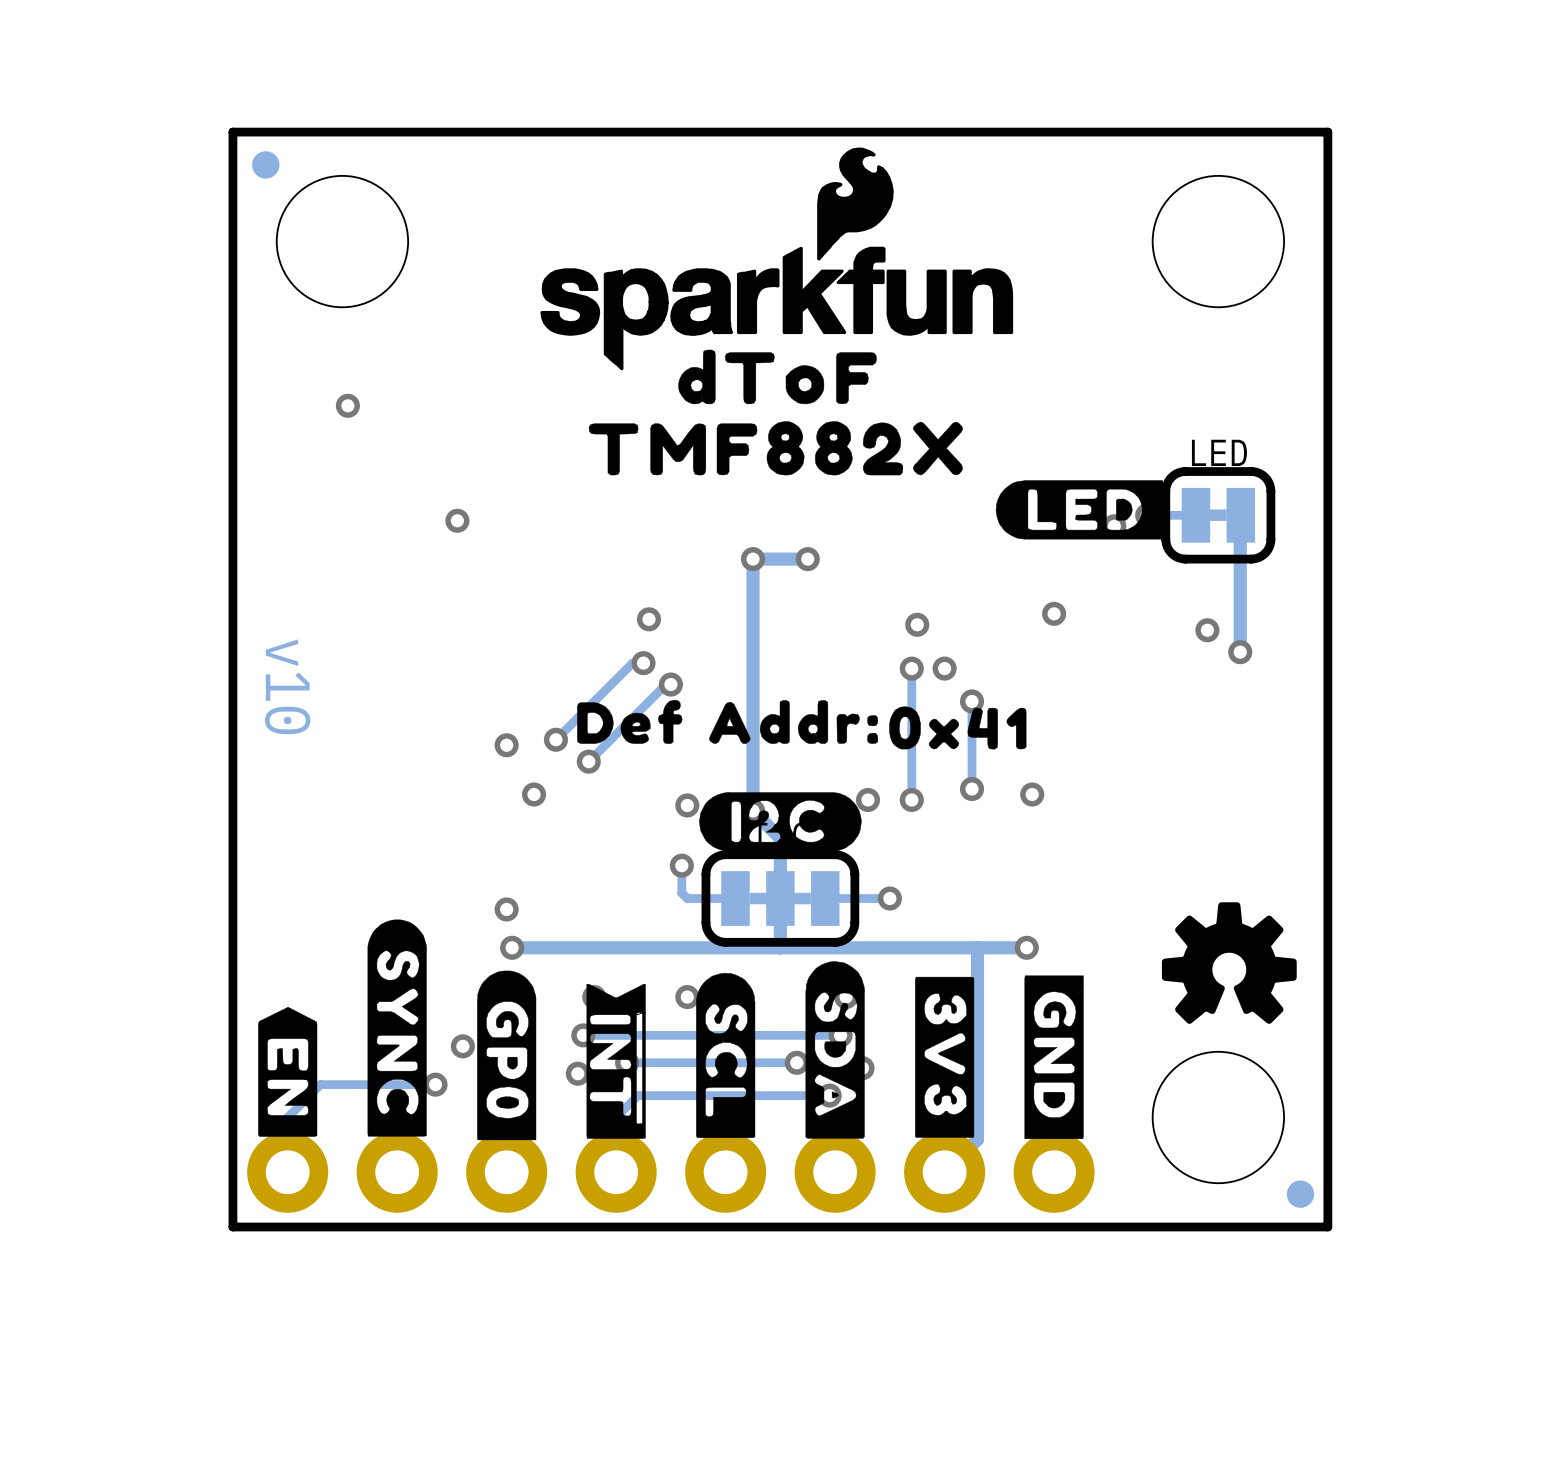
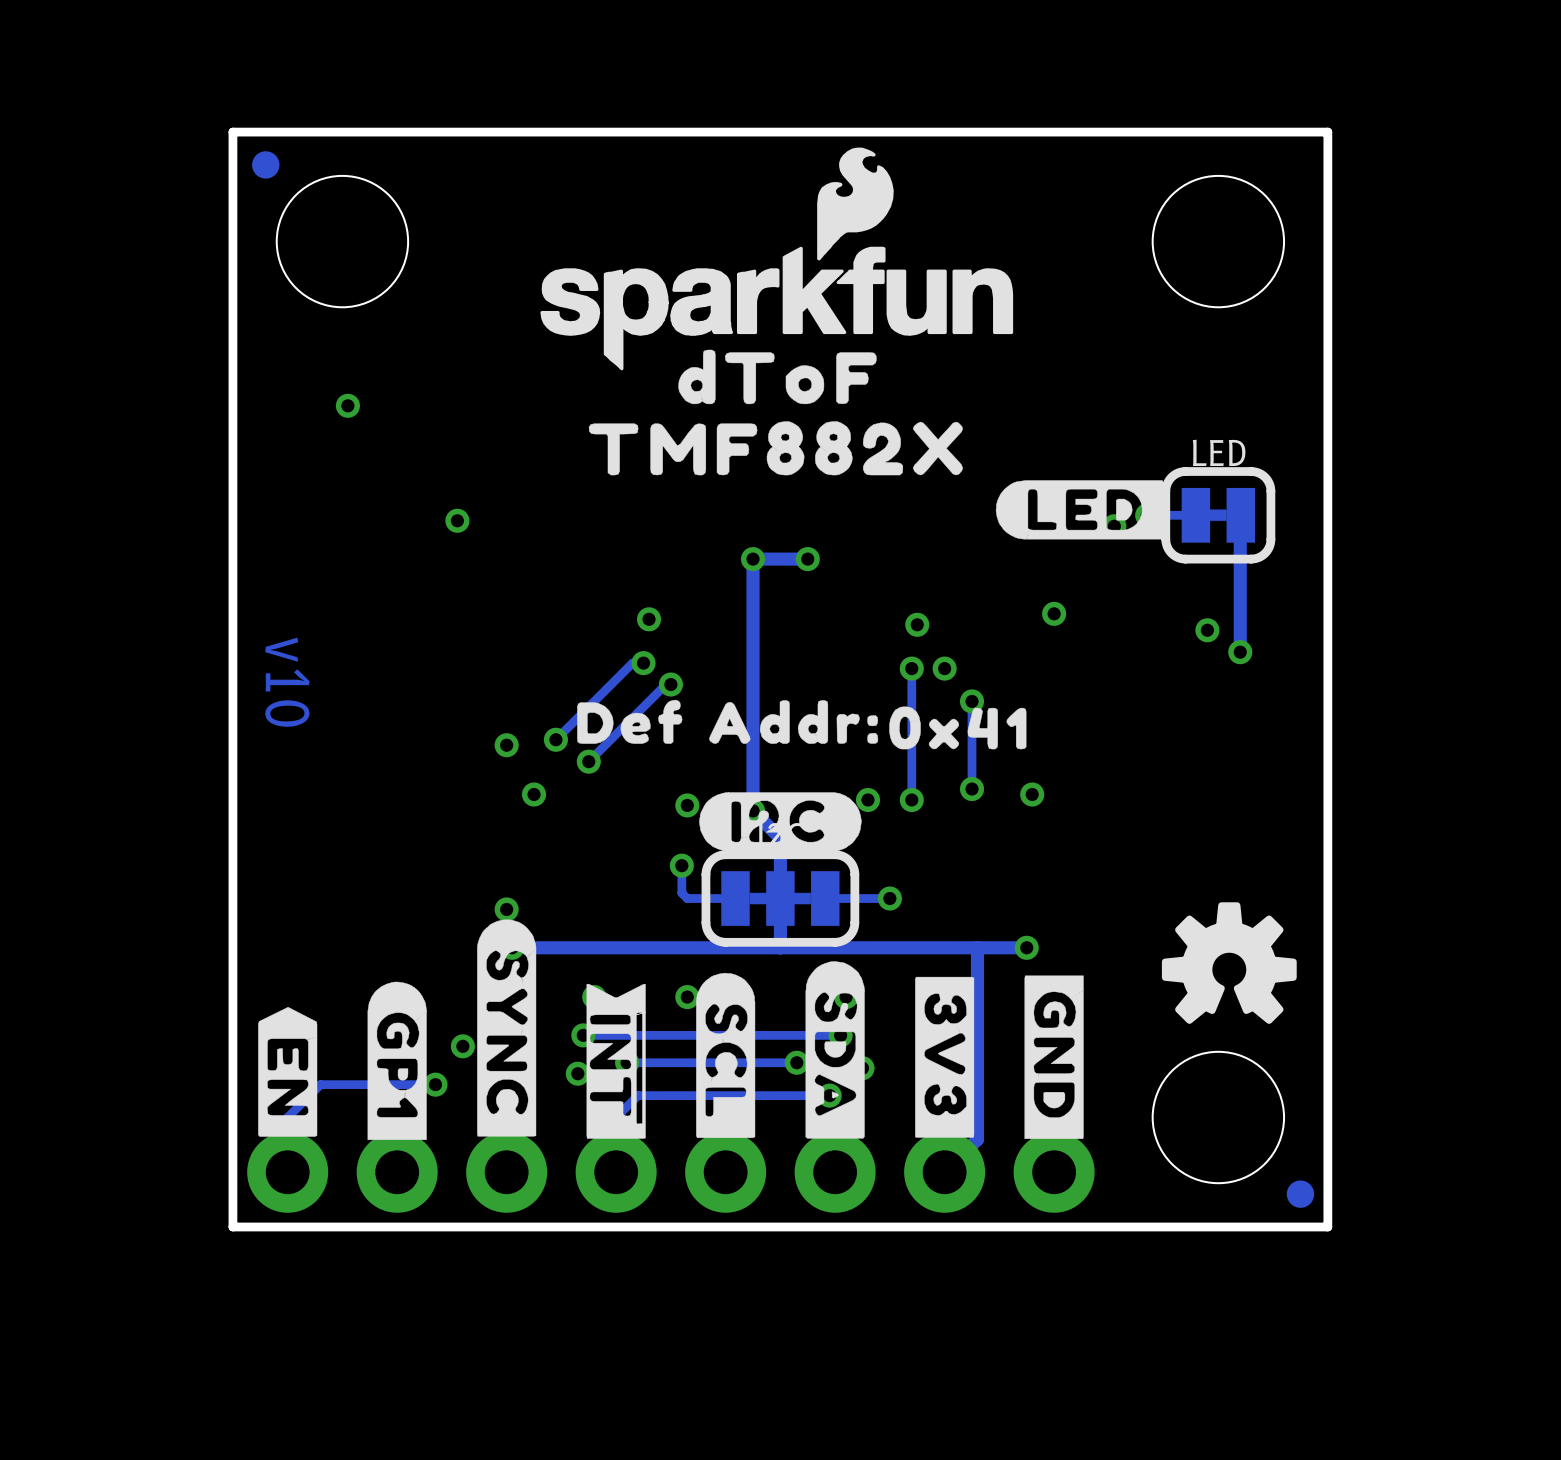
drawing: [477, 970, 537, 1141] -> none
drawing: none -> [367, 981, 427, 1141]
drawing position: (397, 1028) -> (506, 1028)

